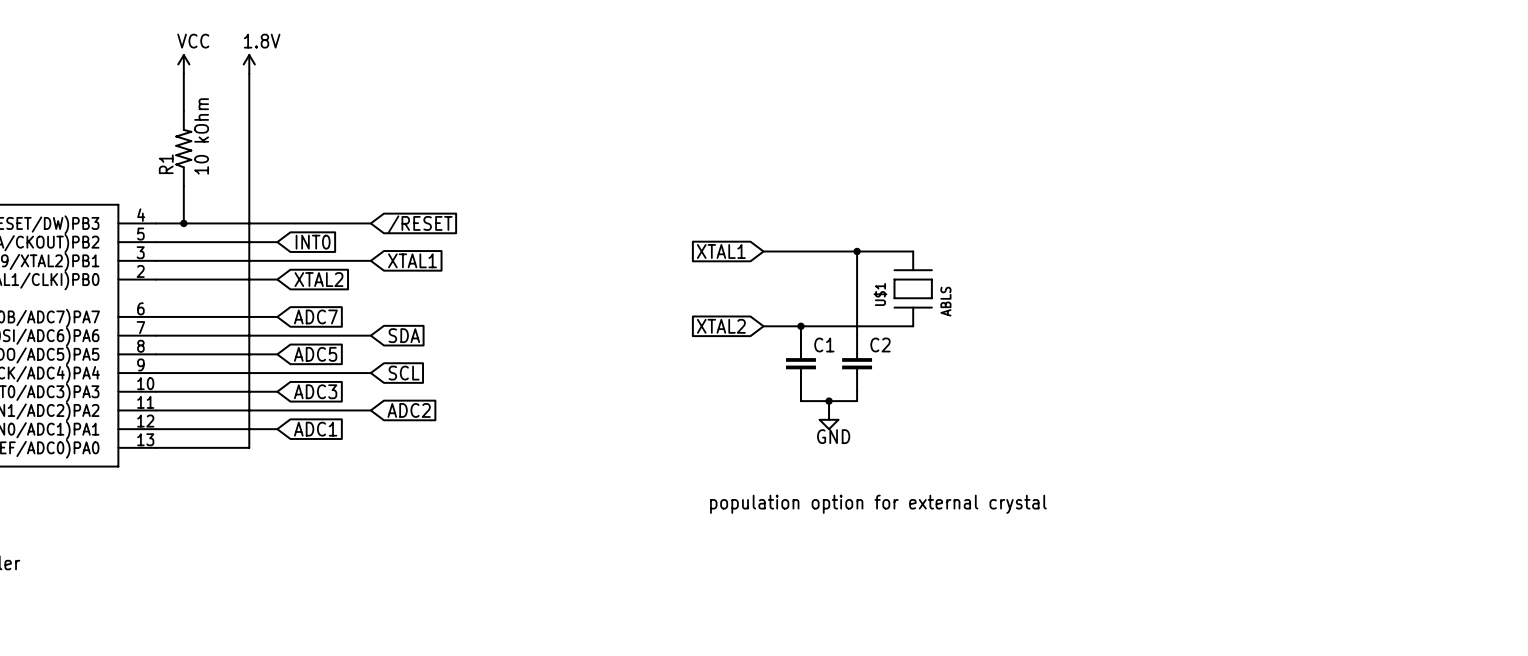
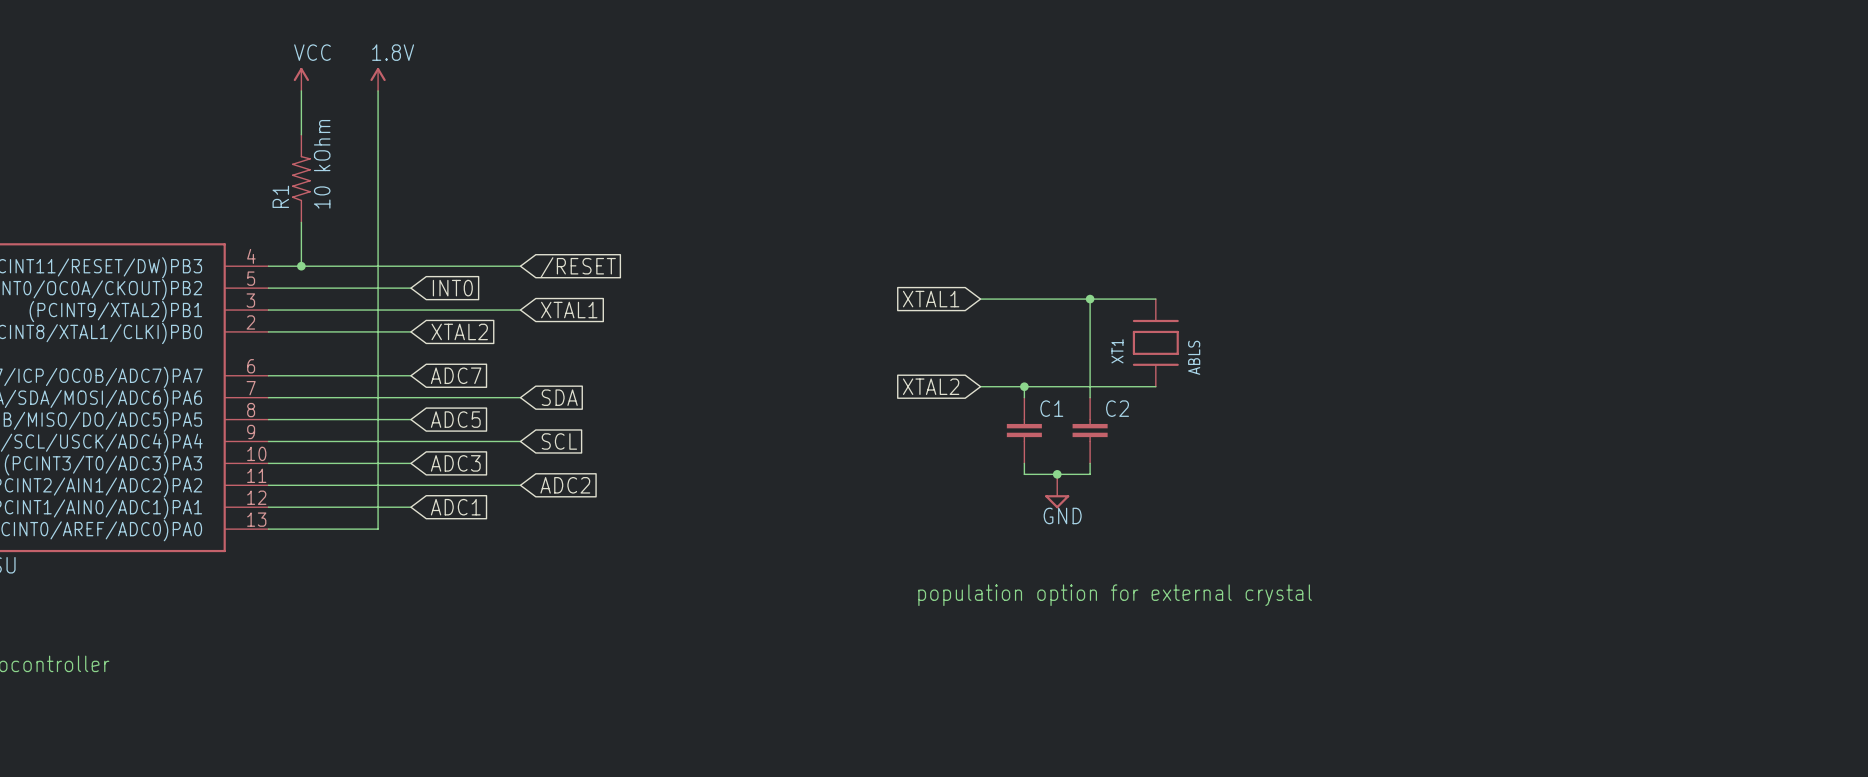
U$1 name: U$1 (880, 294) -> XT1 (1117, 351)

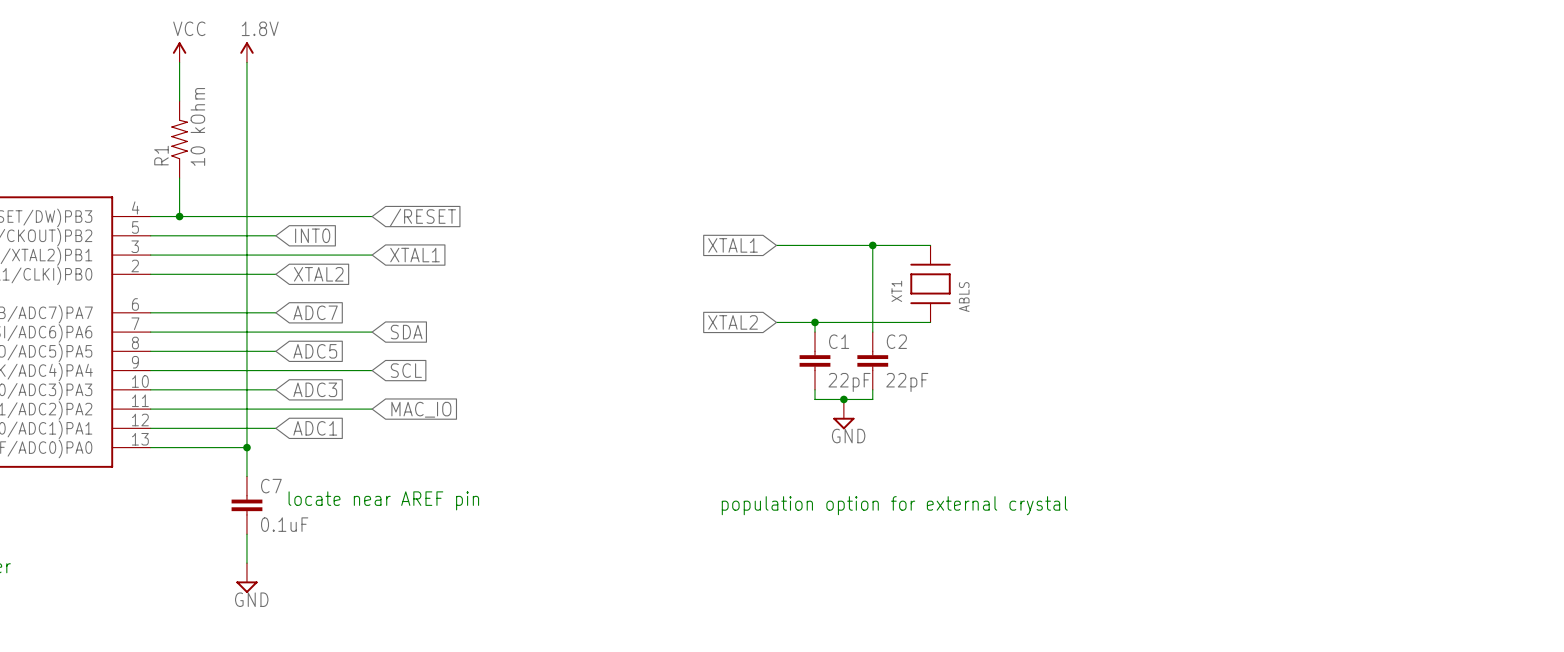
C1 value: none -> 22pF (849, 382)
C2 value: none -> 22pF (907, 382)
global label: ADC2 (565, 485) -> MAC_IO (421, 409)
wire: none -> (246, 447) (246, 476)
junction: none -> (246, 447)
text: none -> locate near AREF pin (383, 500)
C7: none -> 0.1uF (246, 505)
wire: none -> (246, 534) (246, 563)
power symbol: none -> GND (246, 578)

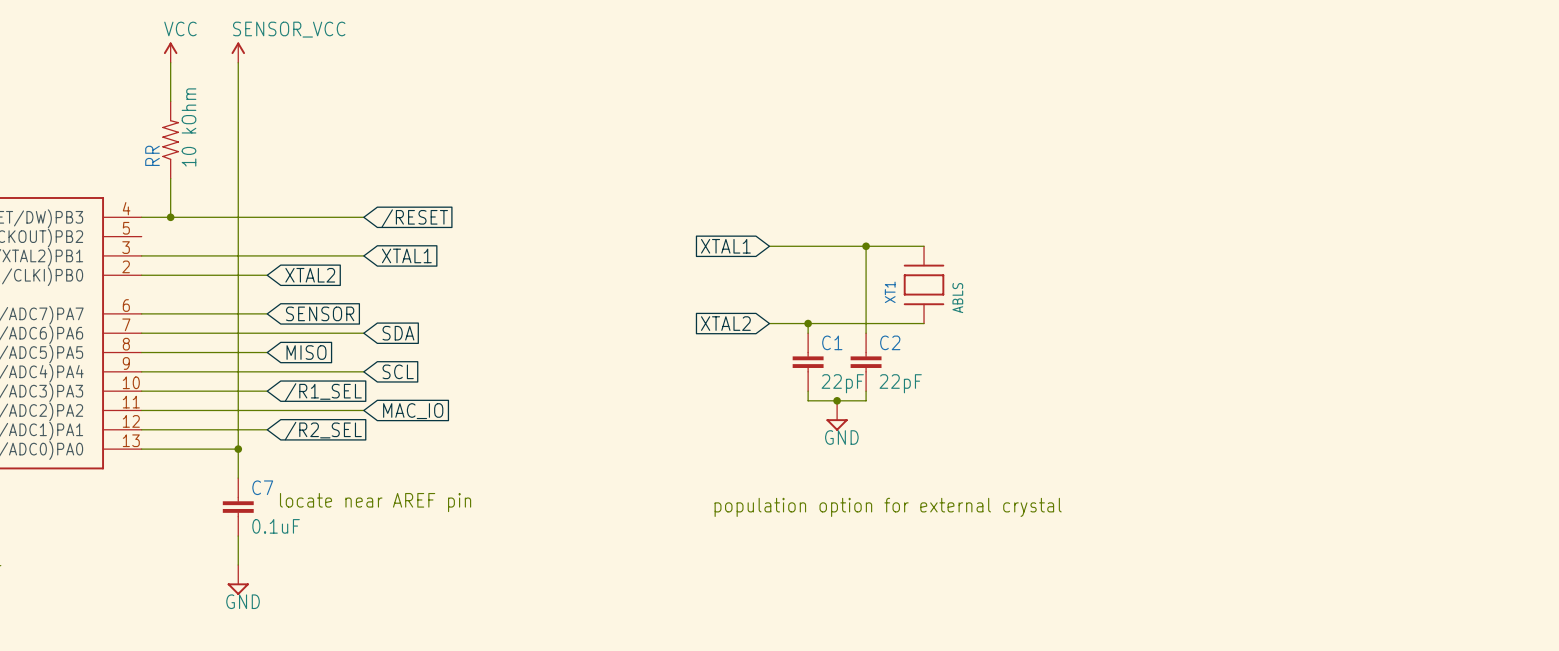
power symbol: 1.8V (246, 52) -> SENSOR_VCC (238, 52)
R1 name: R1 (161, 155) -> RR (152, 155)
wire: (150, 235) (275, 235) -> none
global label: INT0 (312, 235) -> none
global label: ADC7 (315, 312) -> SENSOR (320, 313)
global label: ADC5 (315, 351) -> MISO (306, 352)
global label: ADC3 (315, 389) -> /R1_SEL (323, 392)
global label: ADC1 (315, 428) -> /R2_SEL (323, 431)

